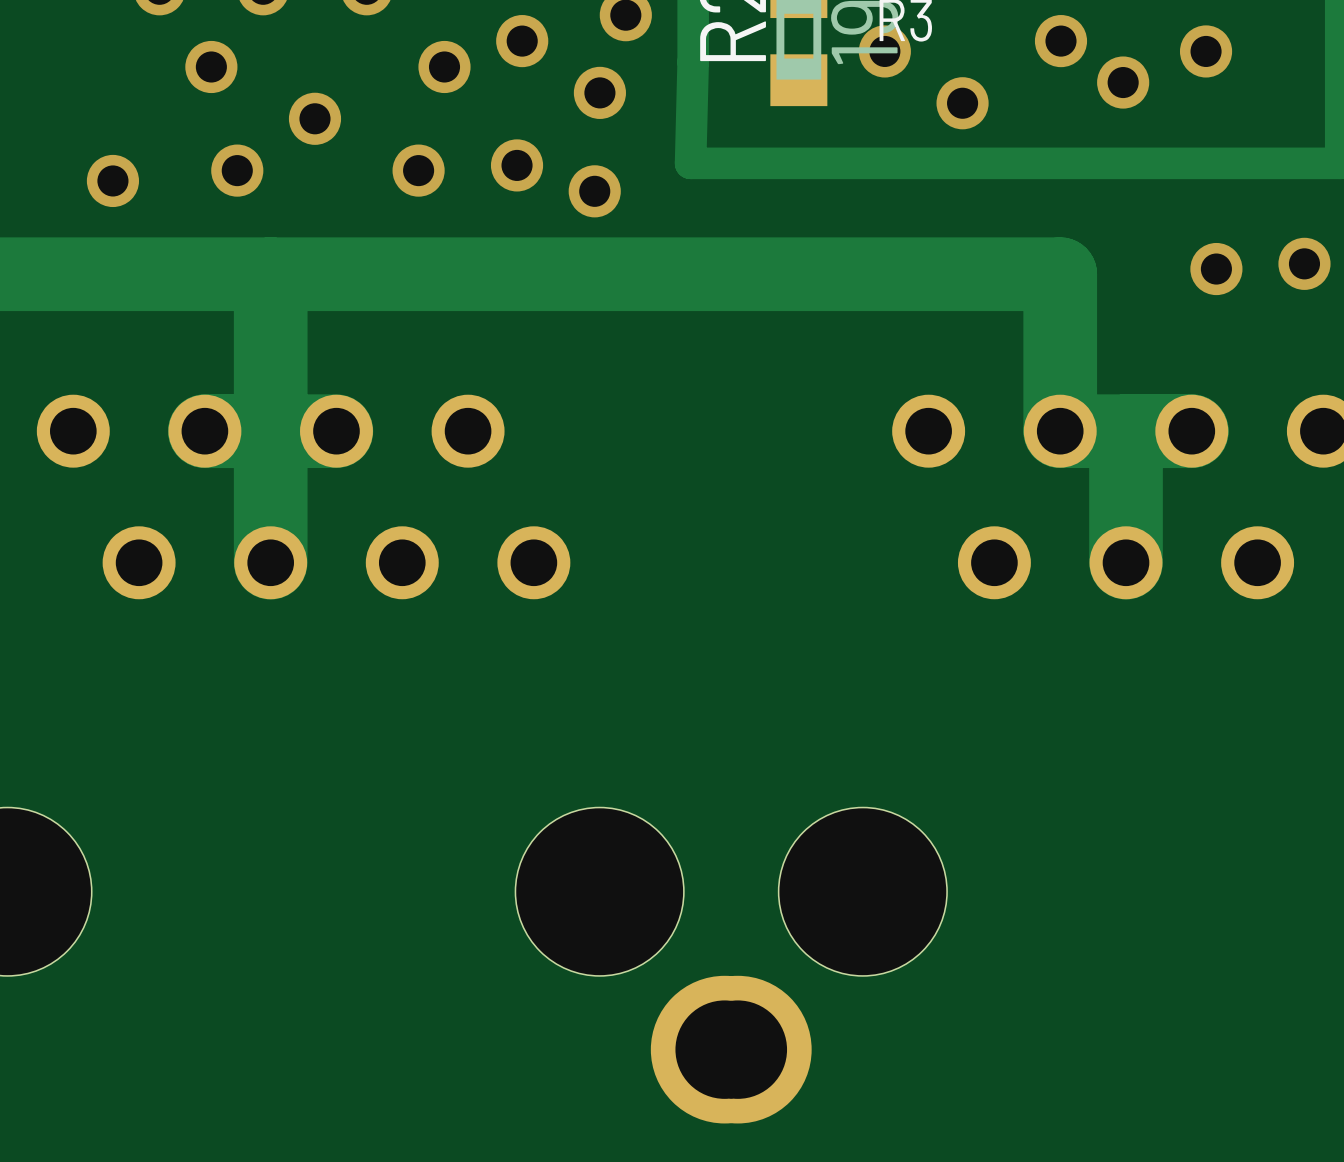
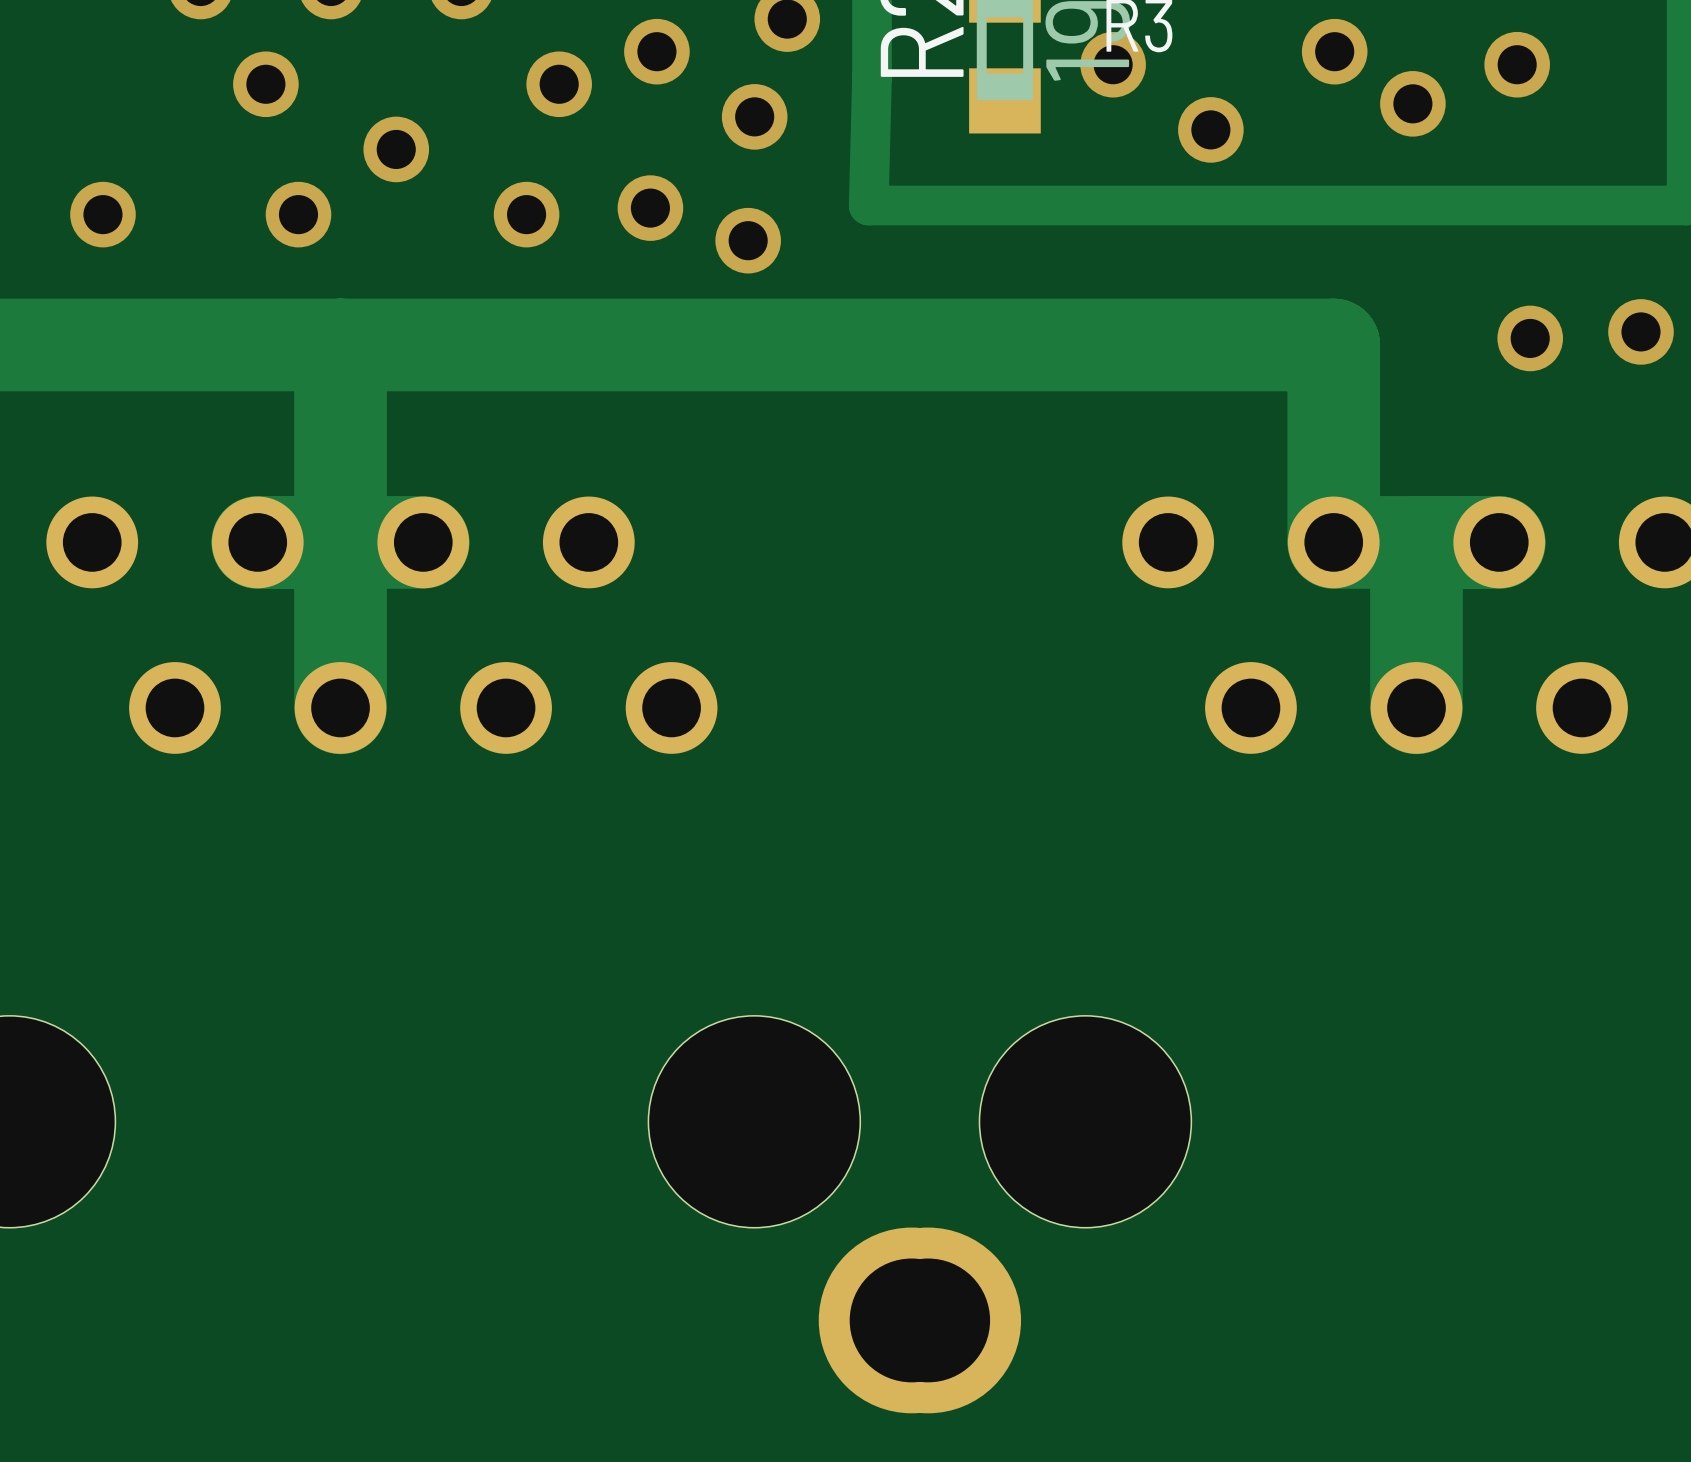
via position: (112, 180) -> (102, 214)

